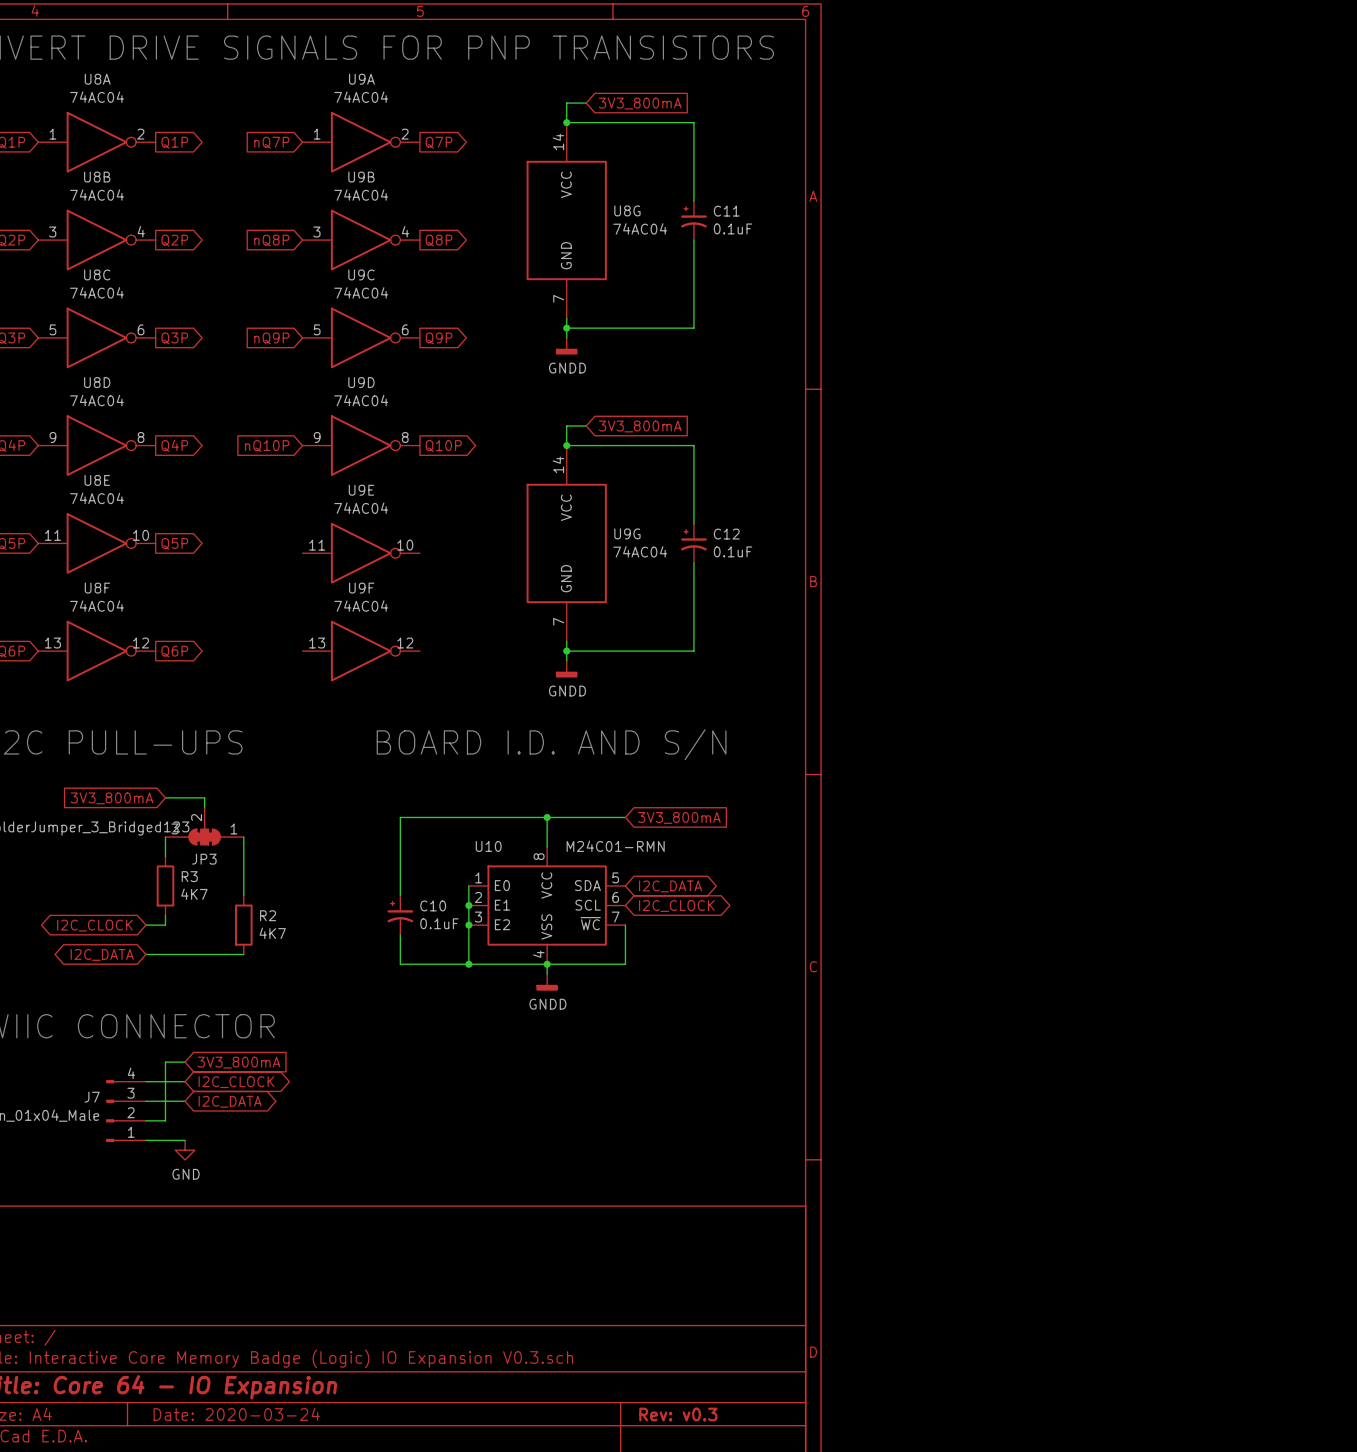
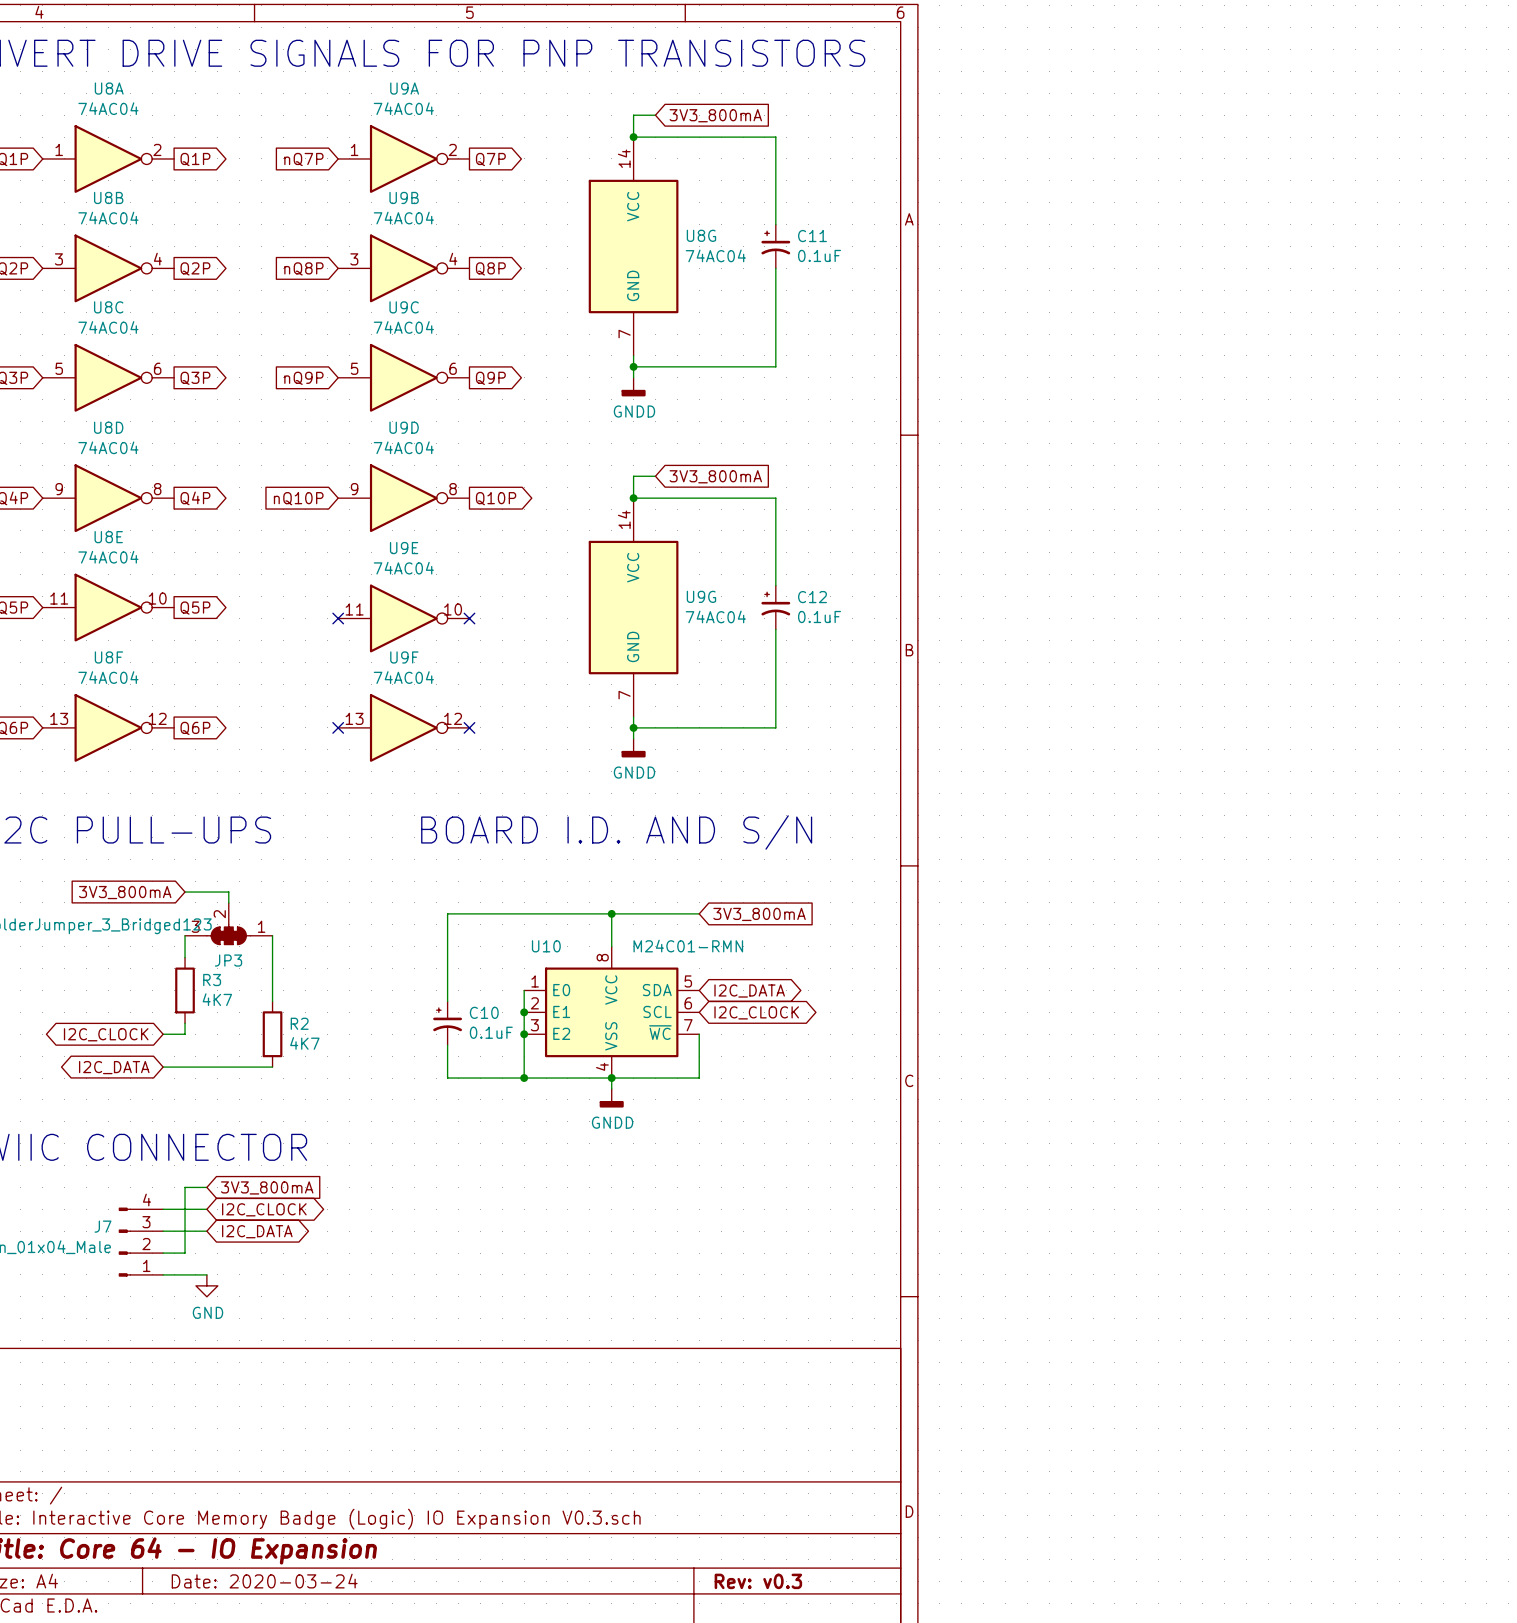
no-connect mark: none -> (338, 618)
no-connect mark: none -> (469, 618)
no-connect mark: none -> (338, 727)
no-connect mark: none -> (469, 727)

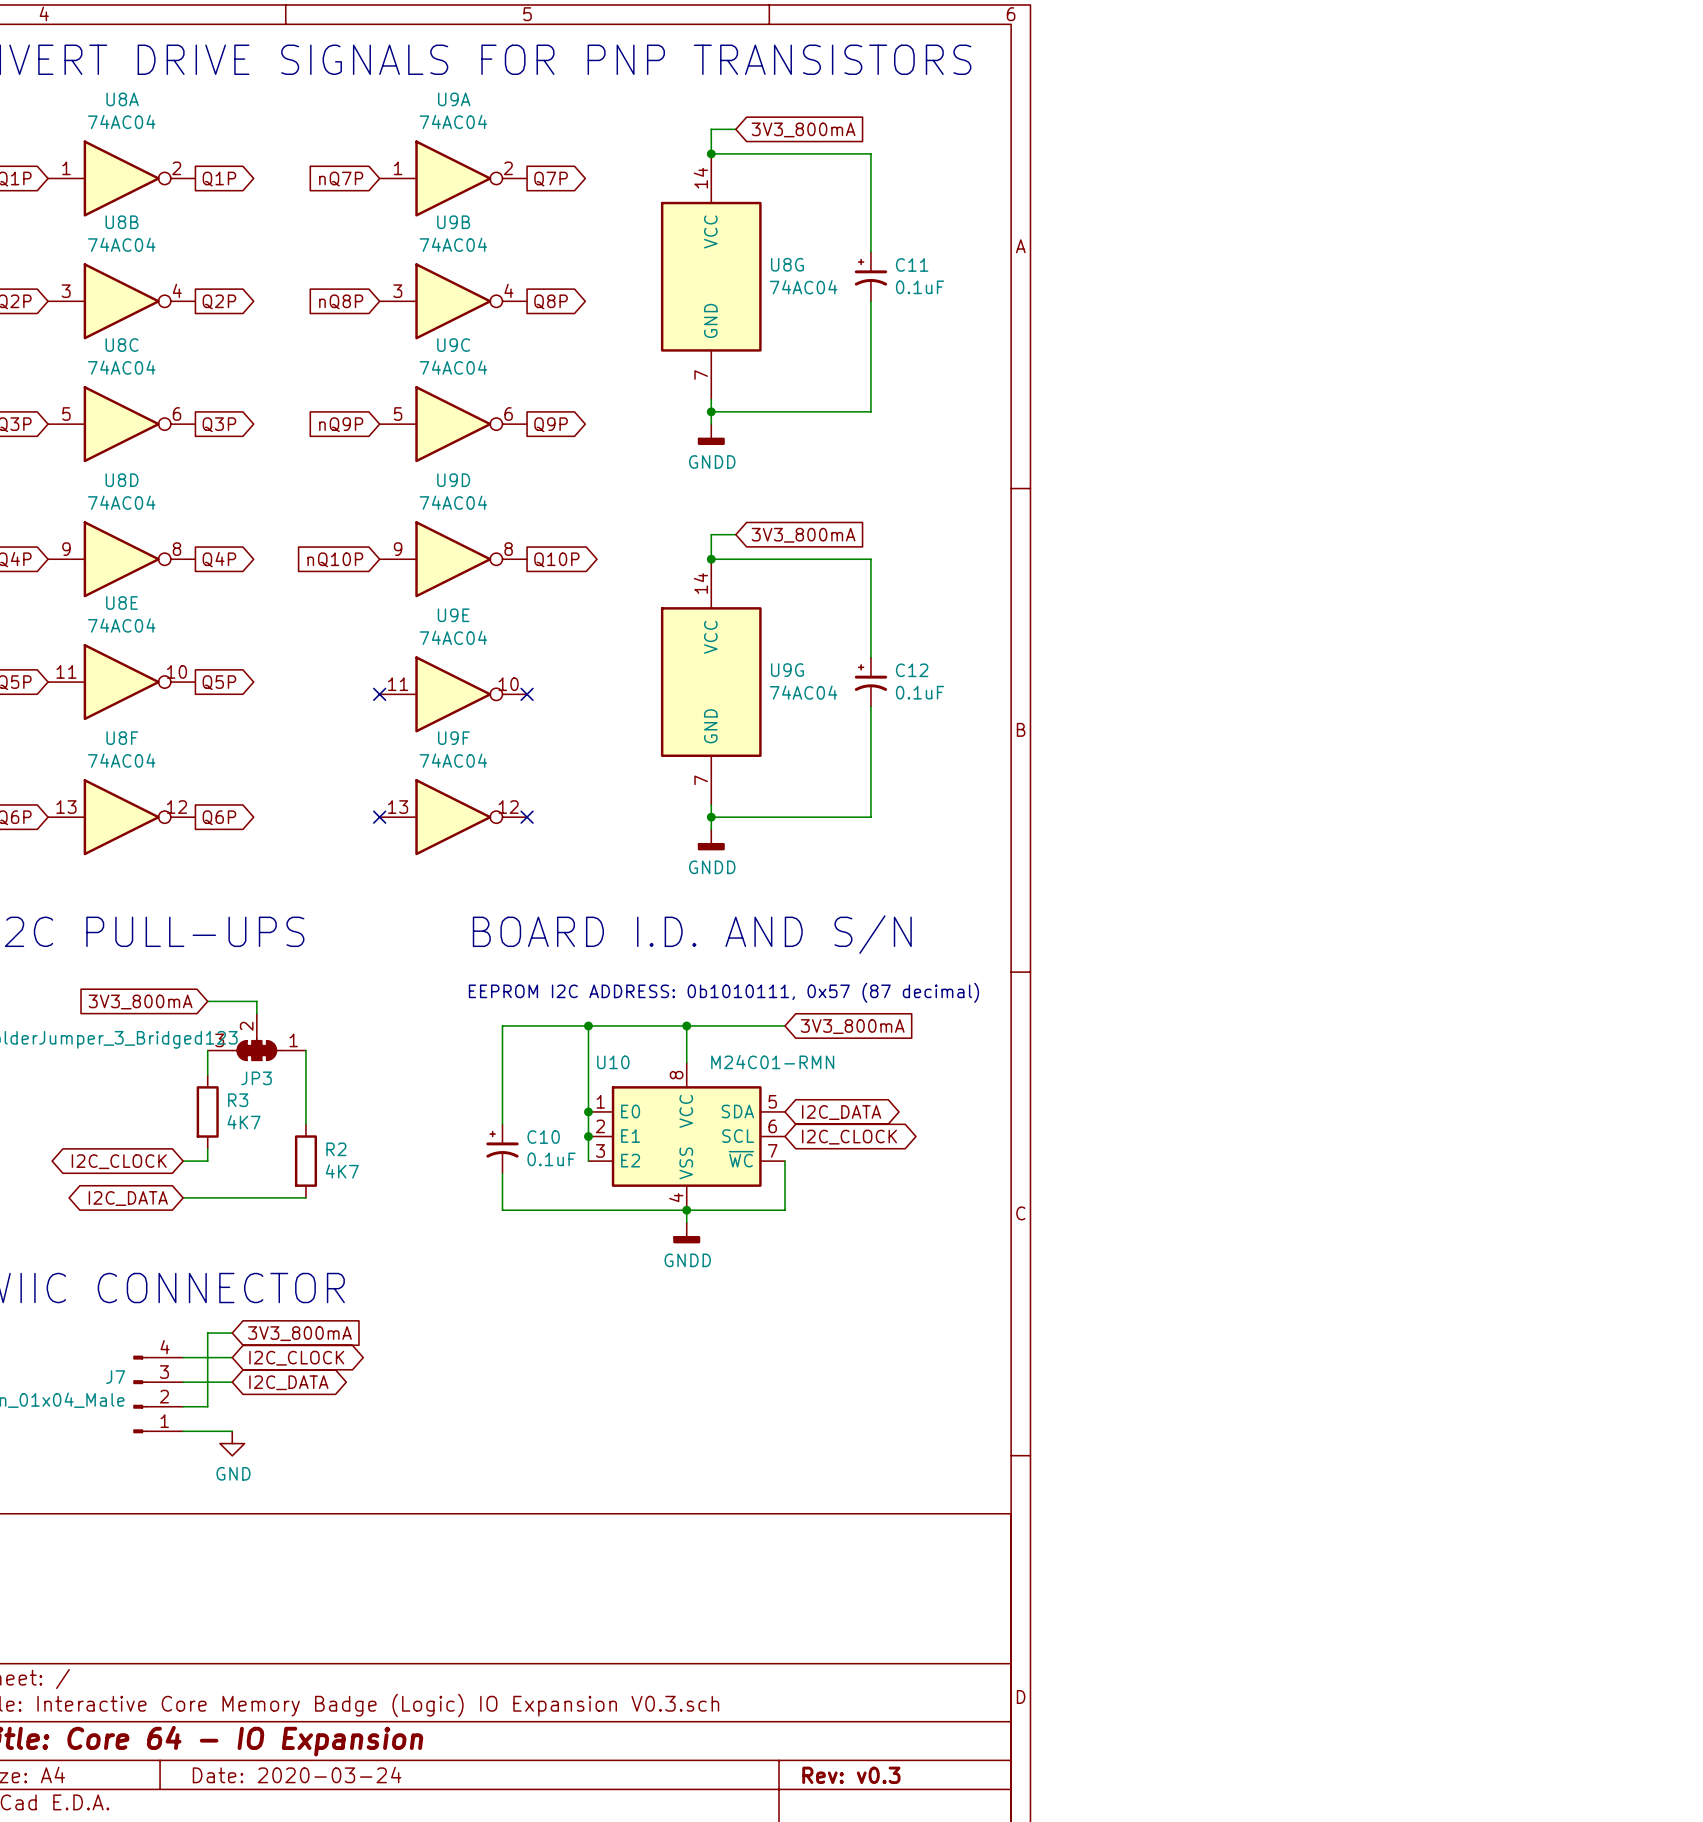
text: none -> EEPROM I2C ADDRESS: 0b1010111, 0x57 (87 decimal) (723, 992)
wire: none -> (588, 1025) (588, 1111)
junction: none -> (588, 1025)
junction: none -> (588, 1111)
wire: (524, 1034) (524, 1078) -> none
junction: (524, 1034) -> none
junction: (524, 1078) -> none

